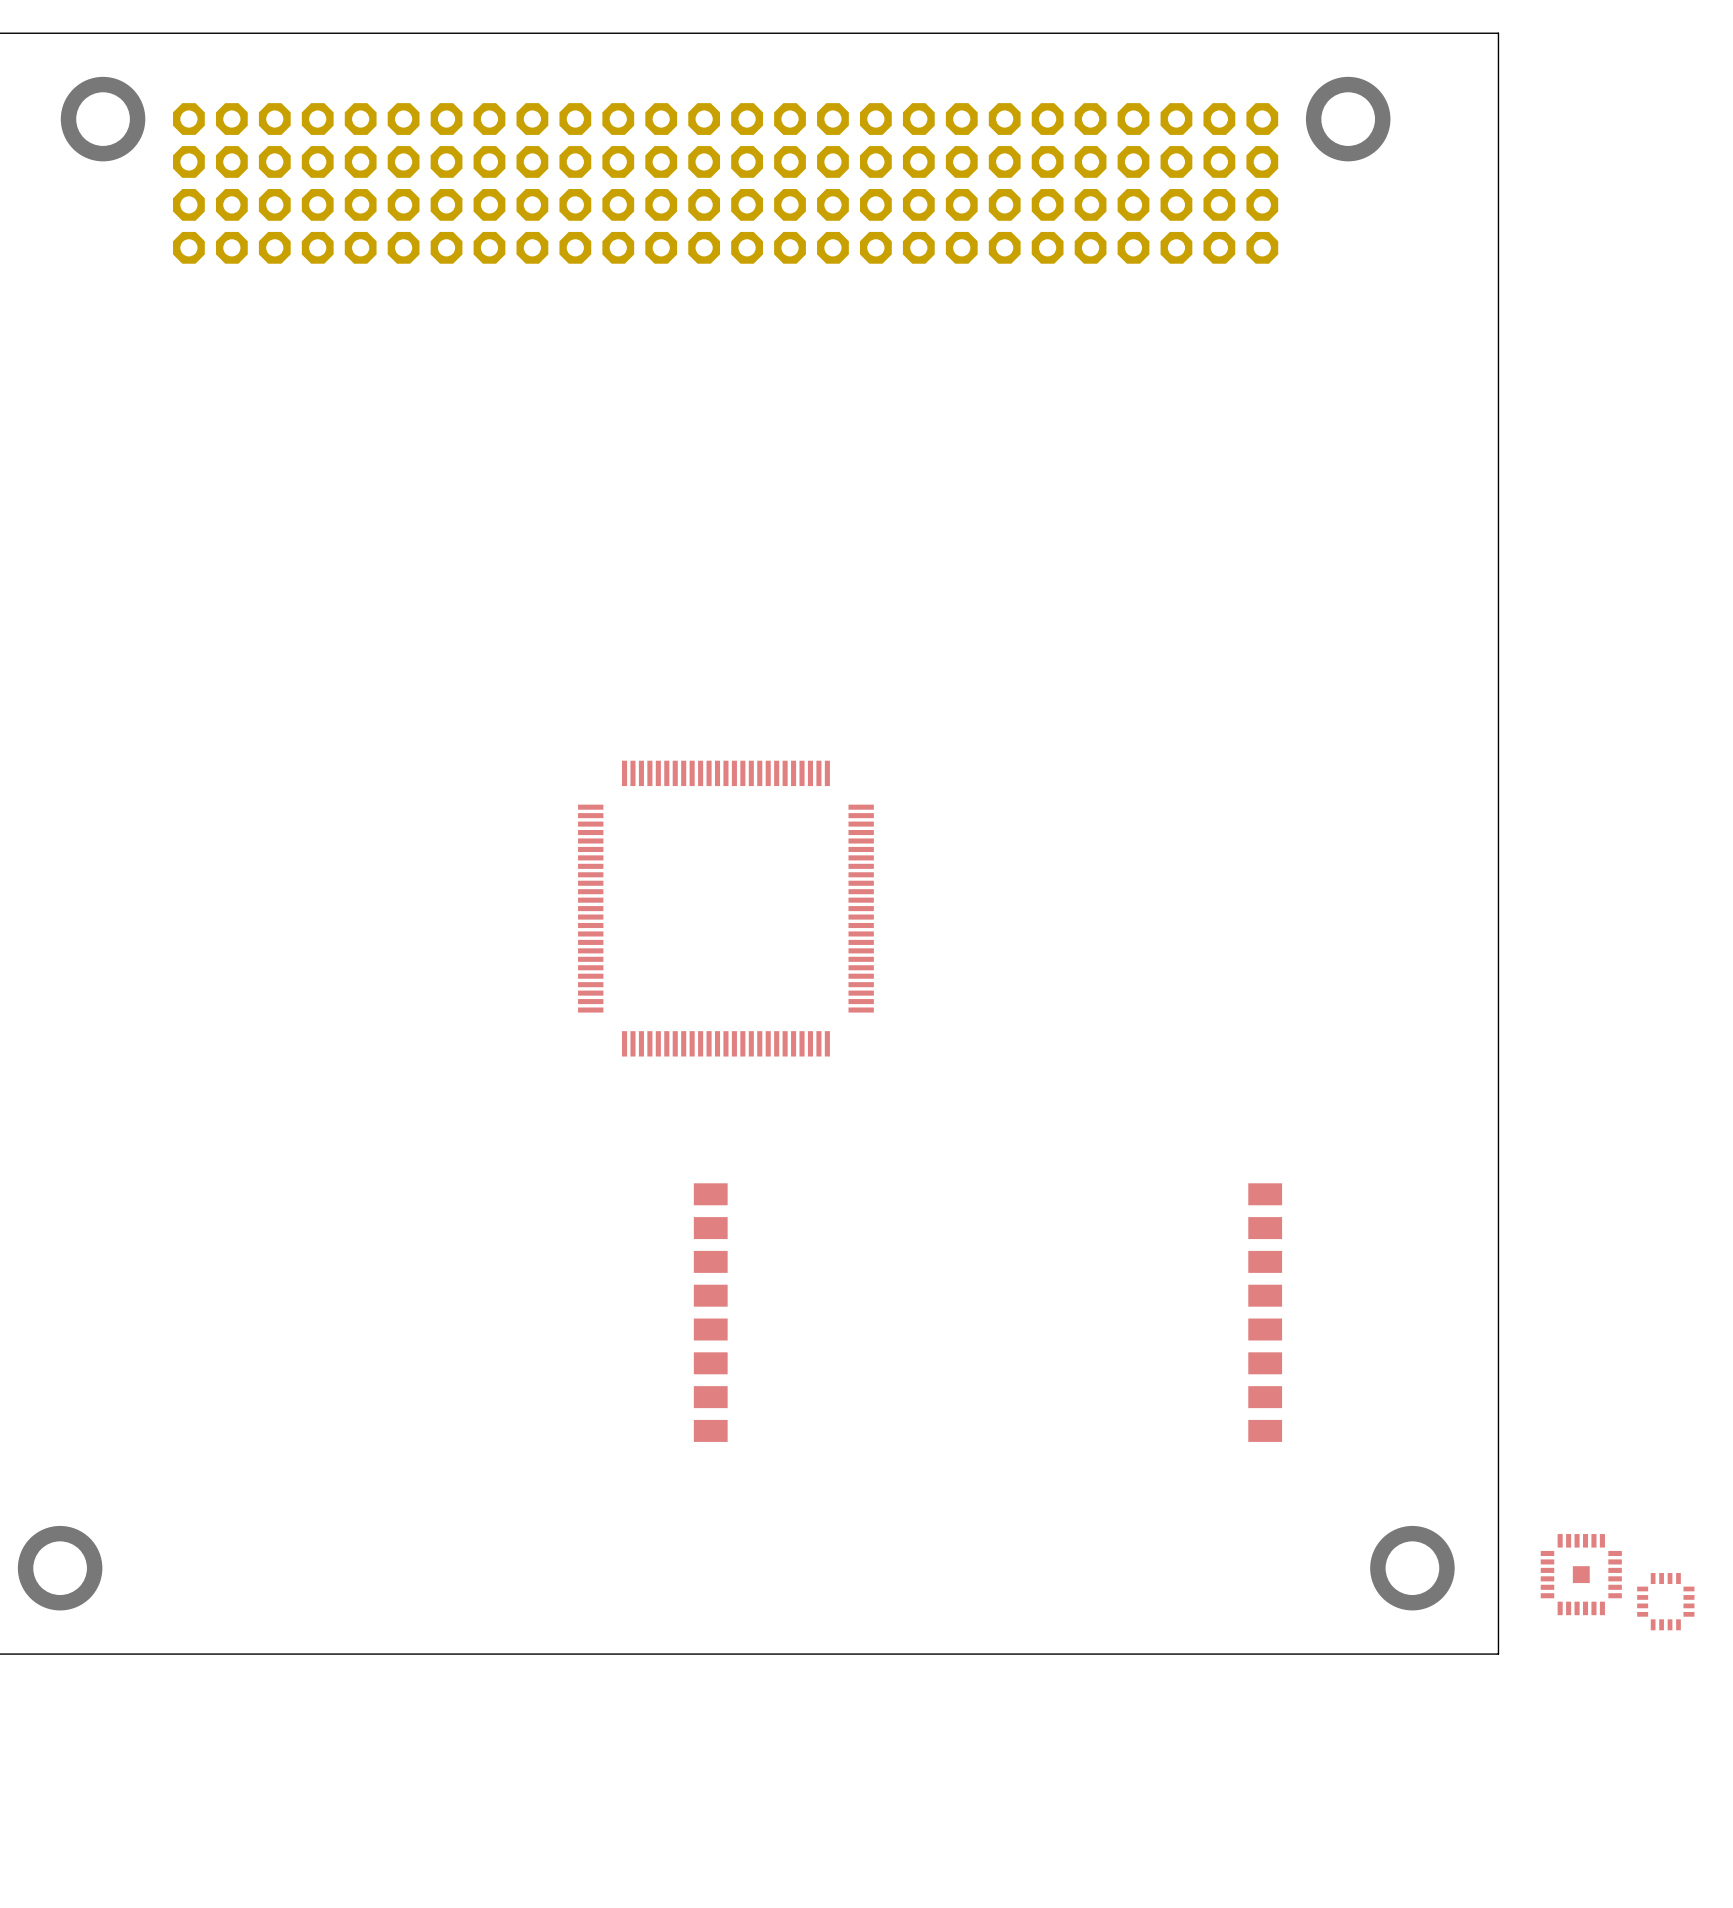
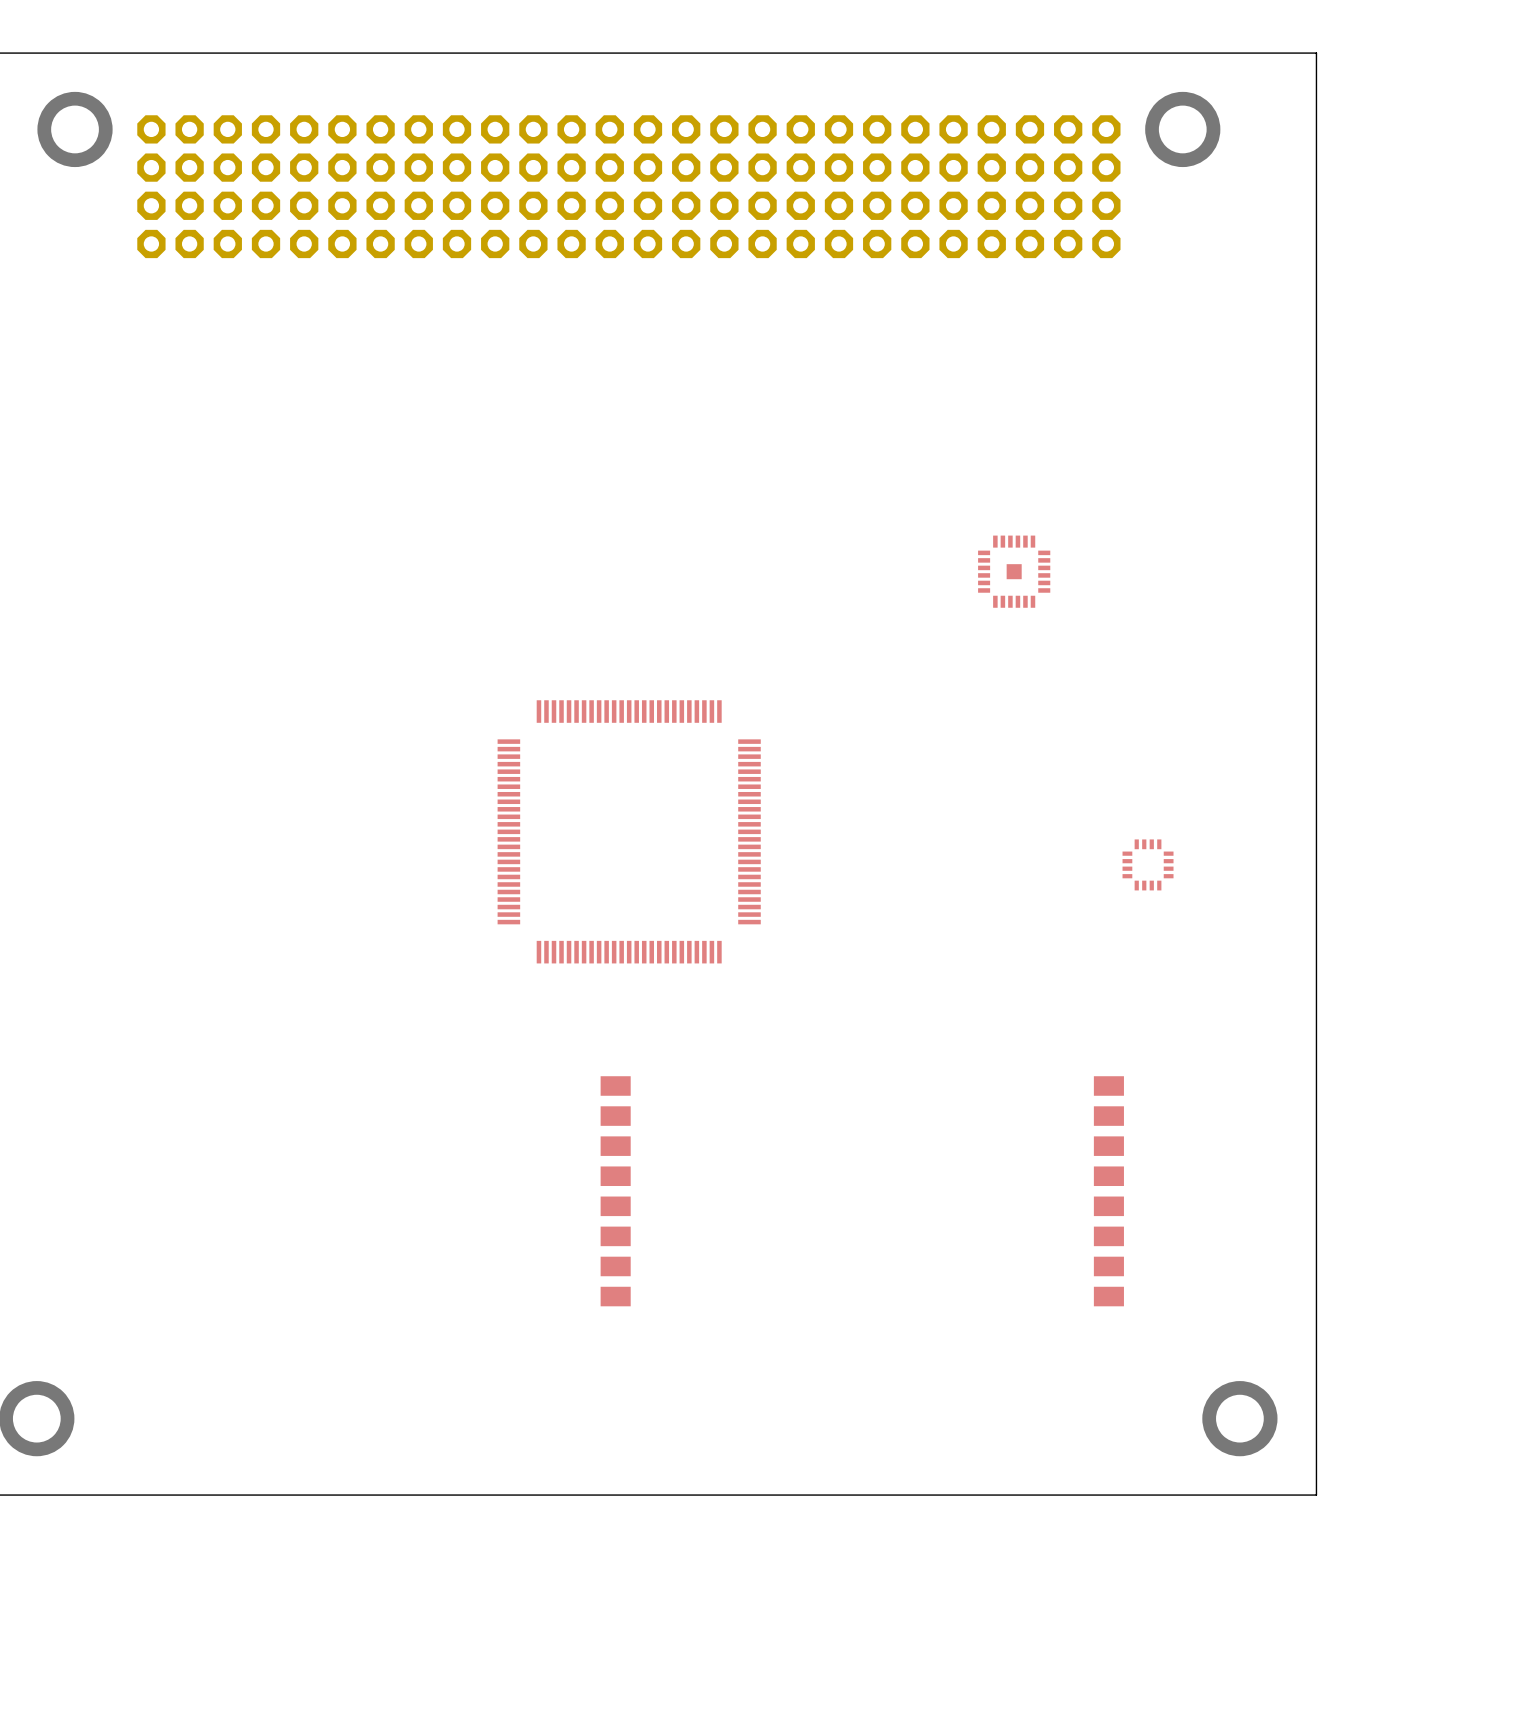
part: none -> (1014, 571)
part: none -> (1148, 864)
part: (1581, 1574) -> none
part: (1665, 1601) -> none

